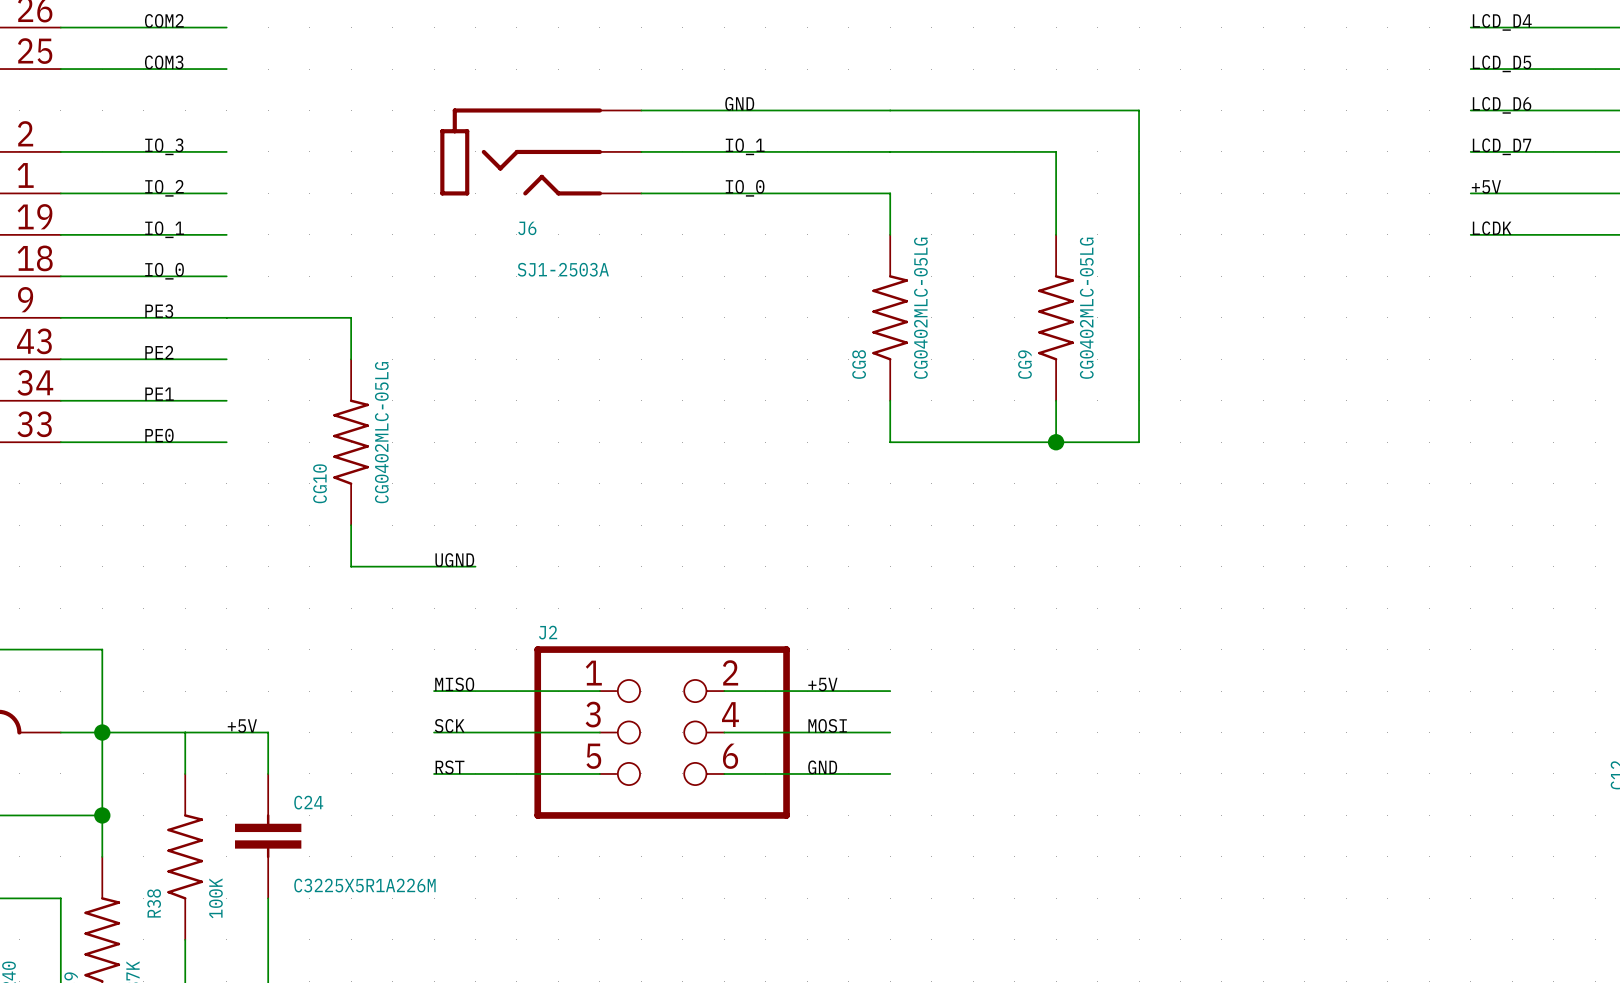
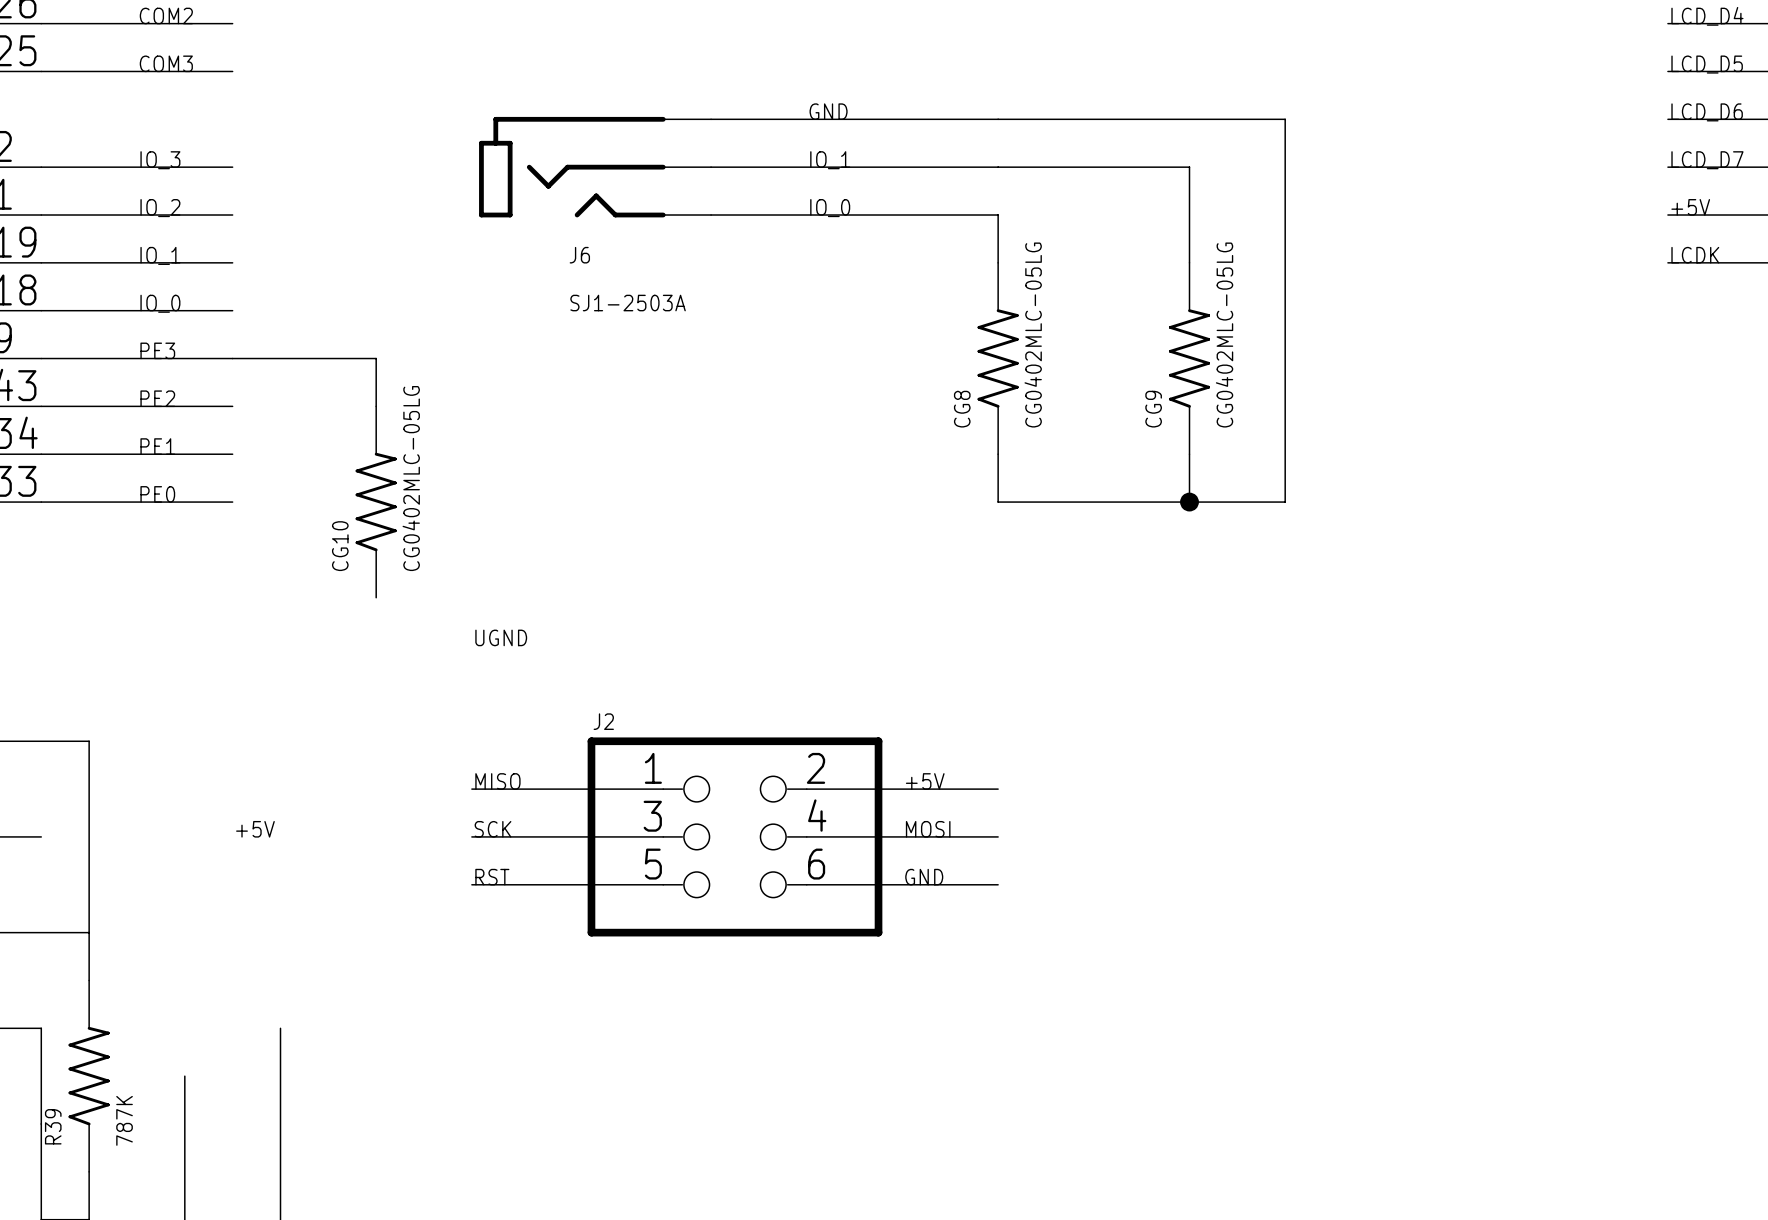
wire: (351, 525) (351, 566) (475, 566) -> none
wire: (60, 732) (268, 732) (268, 773) -> none
junction: (102, 732) -> none
wire: (185, 732) (185, 773) -> none
junction: (102, 815) -> none
C24: C3225X5R1A226M (268, 836) -> none
R38: 100K (185, 856) -> none

